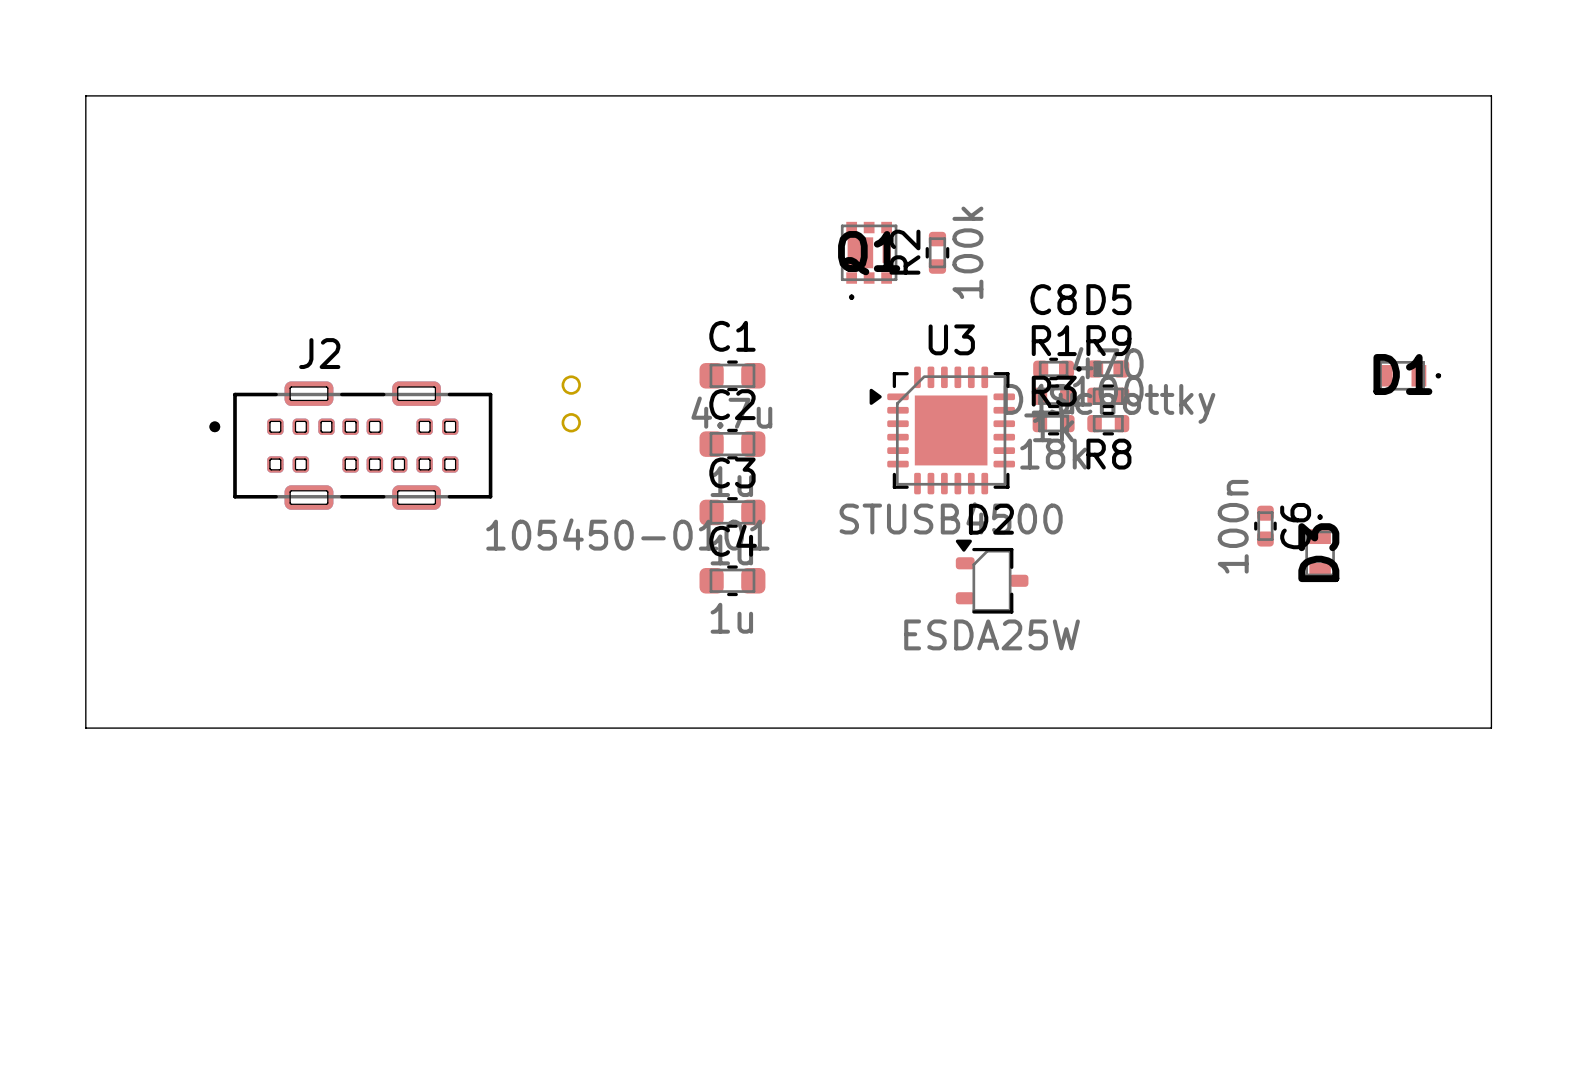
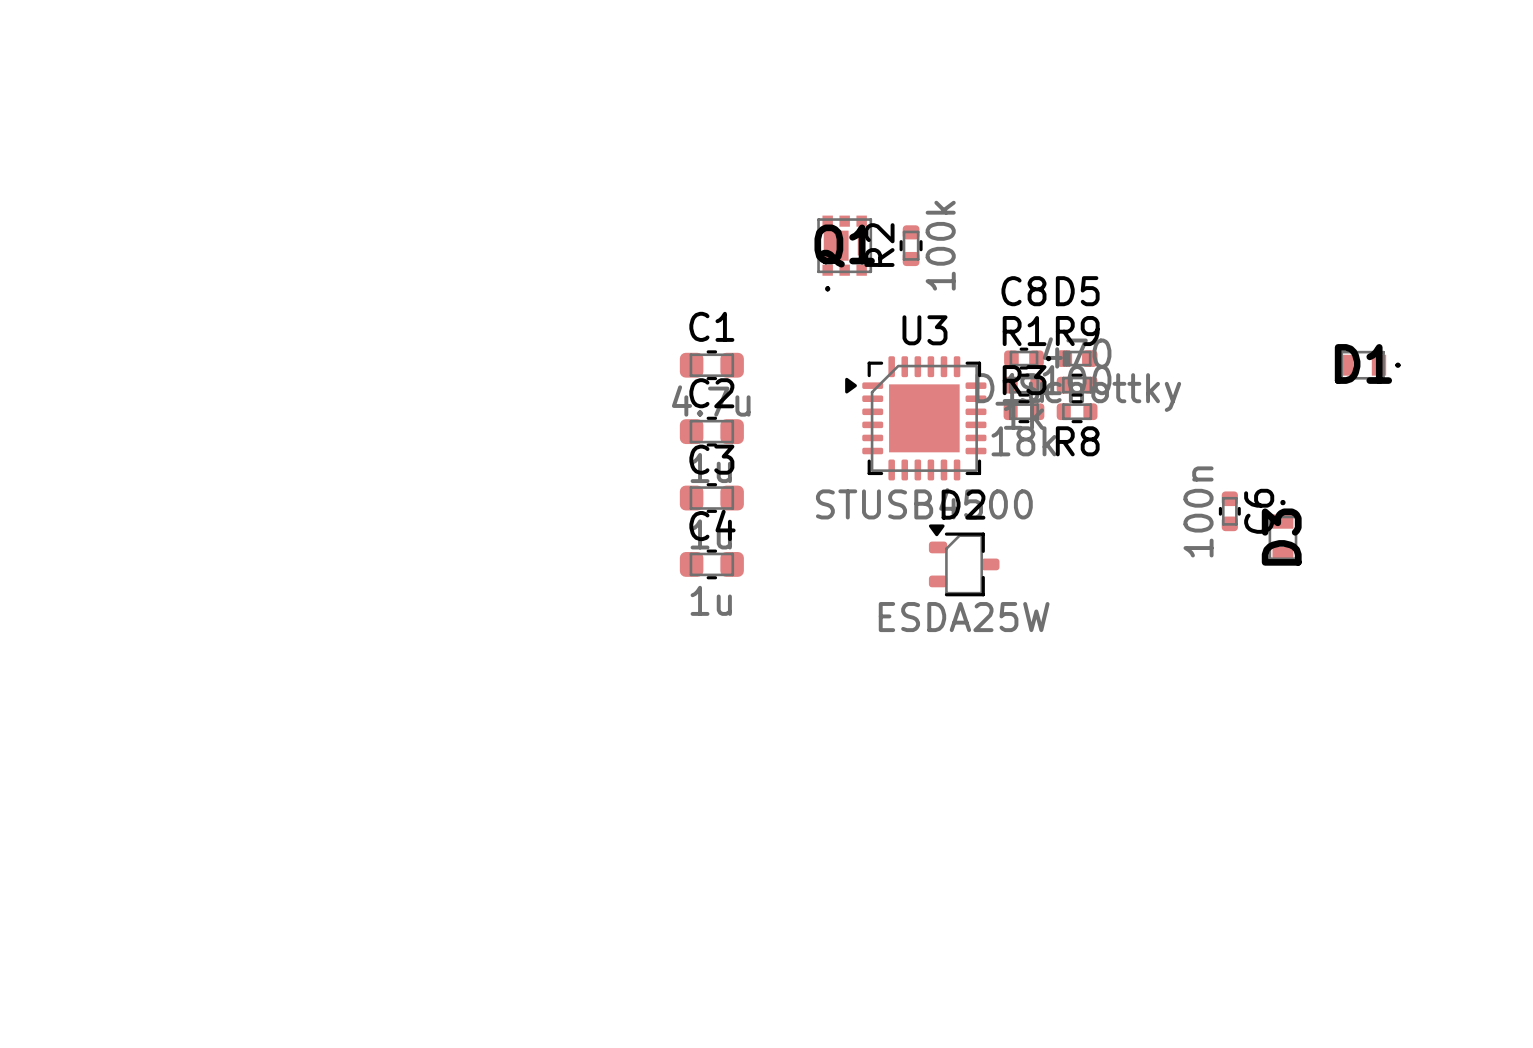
board edge: (85, 95) (1491, 95) (1491, 728) (85, 728) (85, 95) -> none
J2: 105450-0101 (395, 442) -> none

